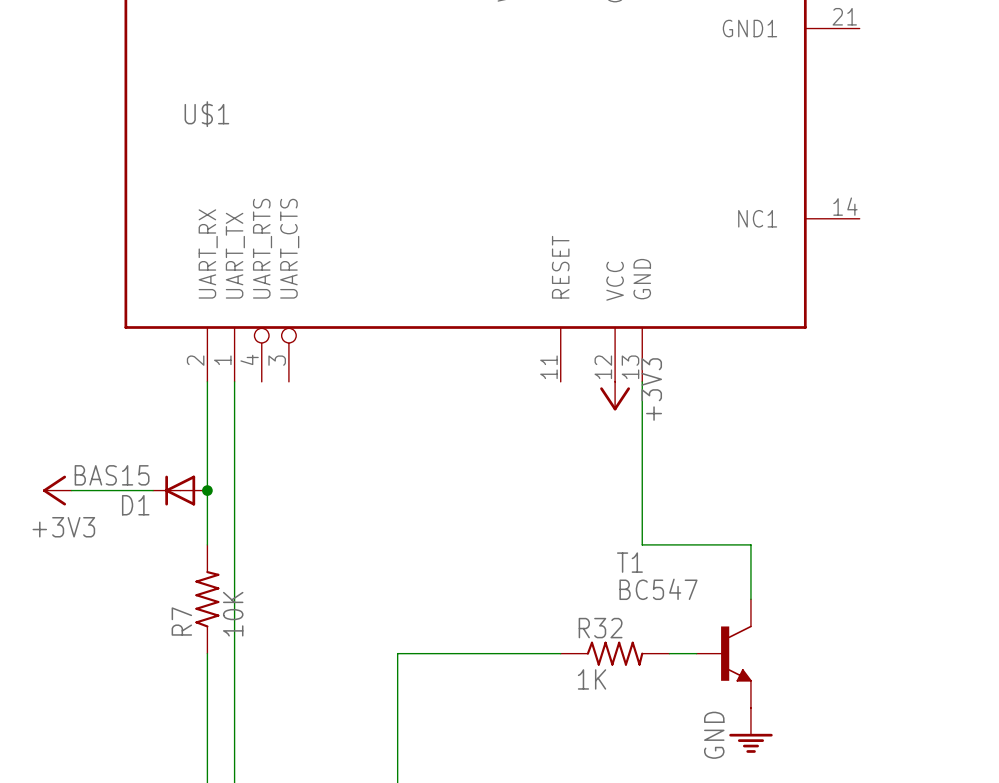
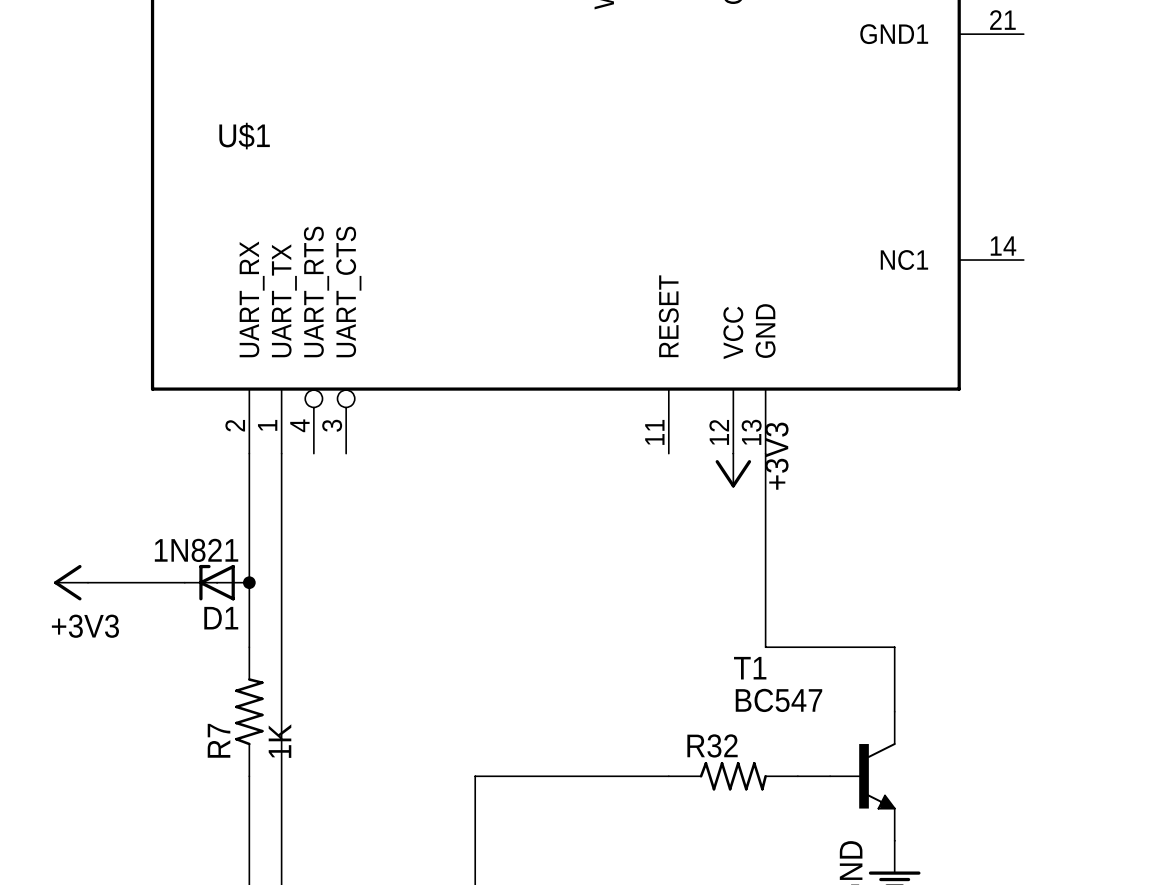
D1 value: BAS15 (112, 475) -> 1N821 (196, 550)
D1 symbol: [153, 475, 208, 506] -> [184, 564, 250, 601]
D1 name position: D1 (135, 505) -> D1 (221, 618)
R7 value: 10K (233, 614) -> 1K (279, 741)
R32 value: 1K (592, 679) -> none

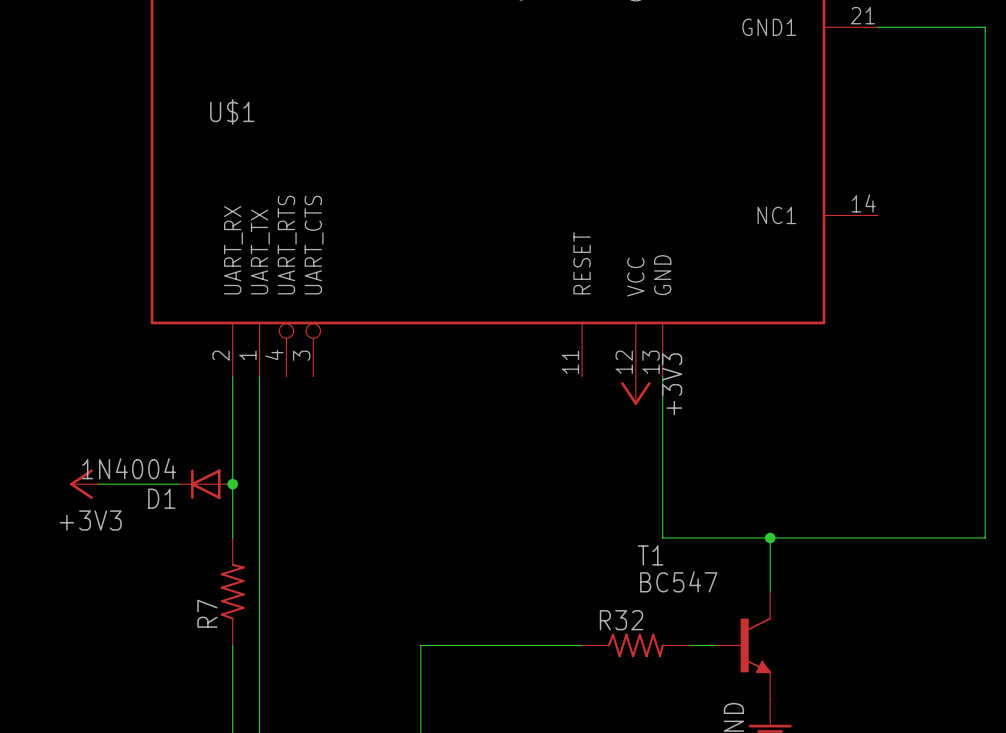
wire: none -> (877, 27) (985, 27) (985, 537) (770, 537)
D1 value: 1N821 (196, 550) -> 1N4004 (129, 468)
D1 symbol: [184, 564, 250, 601] -> [178, 469, 233, 500]
D1 name position: D1 (221, 618) -> D1 (161, 498)
junction: none -> (770, 537)
R7 value: 1K (279, 741) -> none

